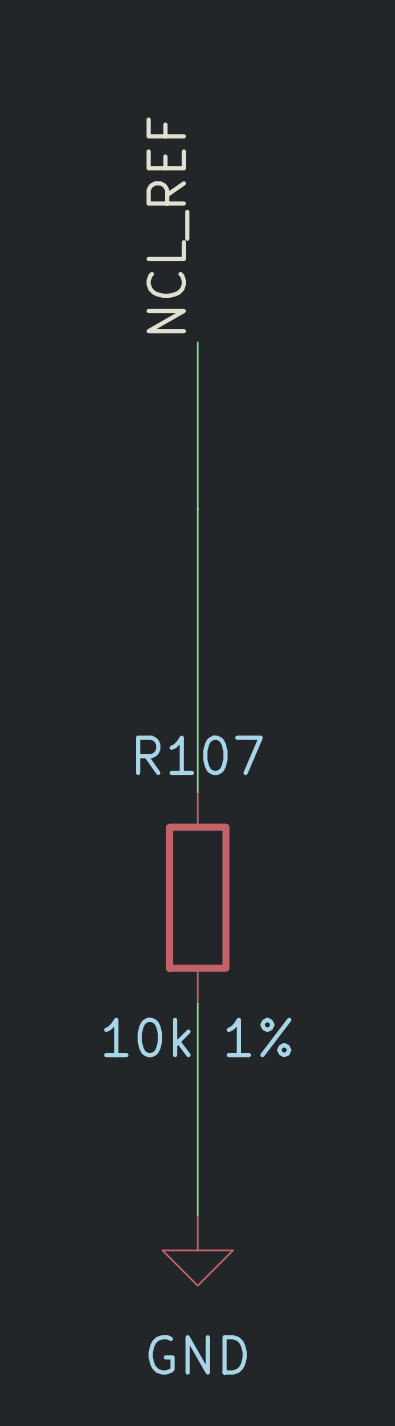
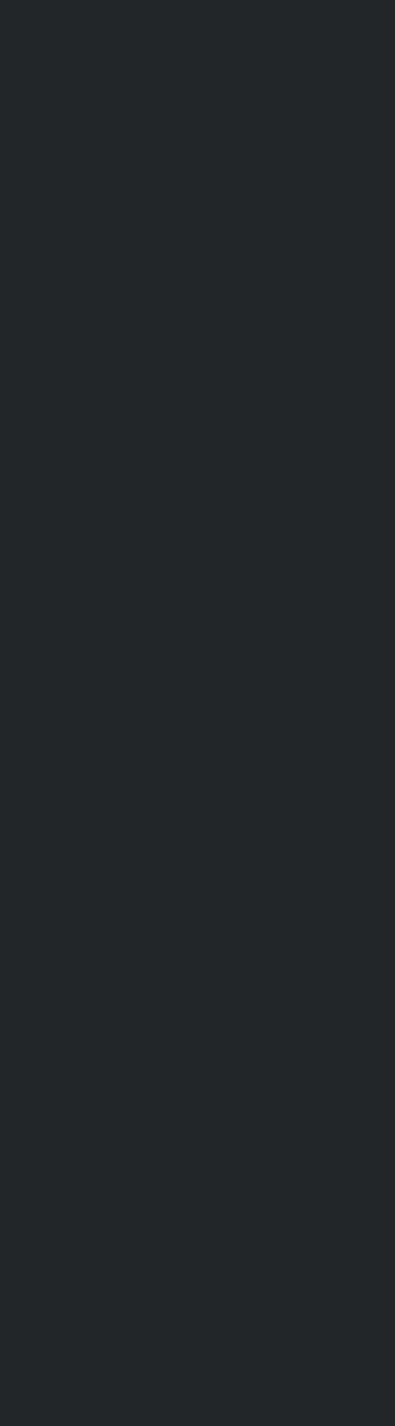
label: NCL_REF (167, 225) -> none
wire: (197, 342) (197, 791) -> none
R107: 10k 1% (197, 897) -> none
wire: (197, 1003) (197, 1215) -> none
power symbol: GND (197, 1250) -> none

